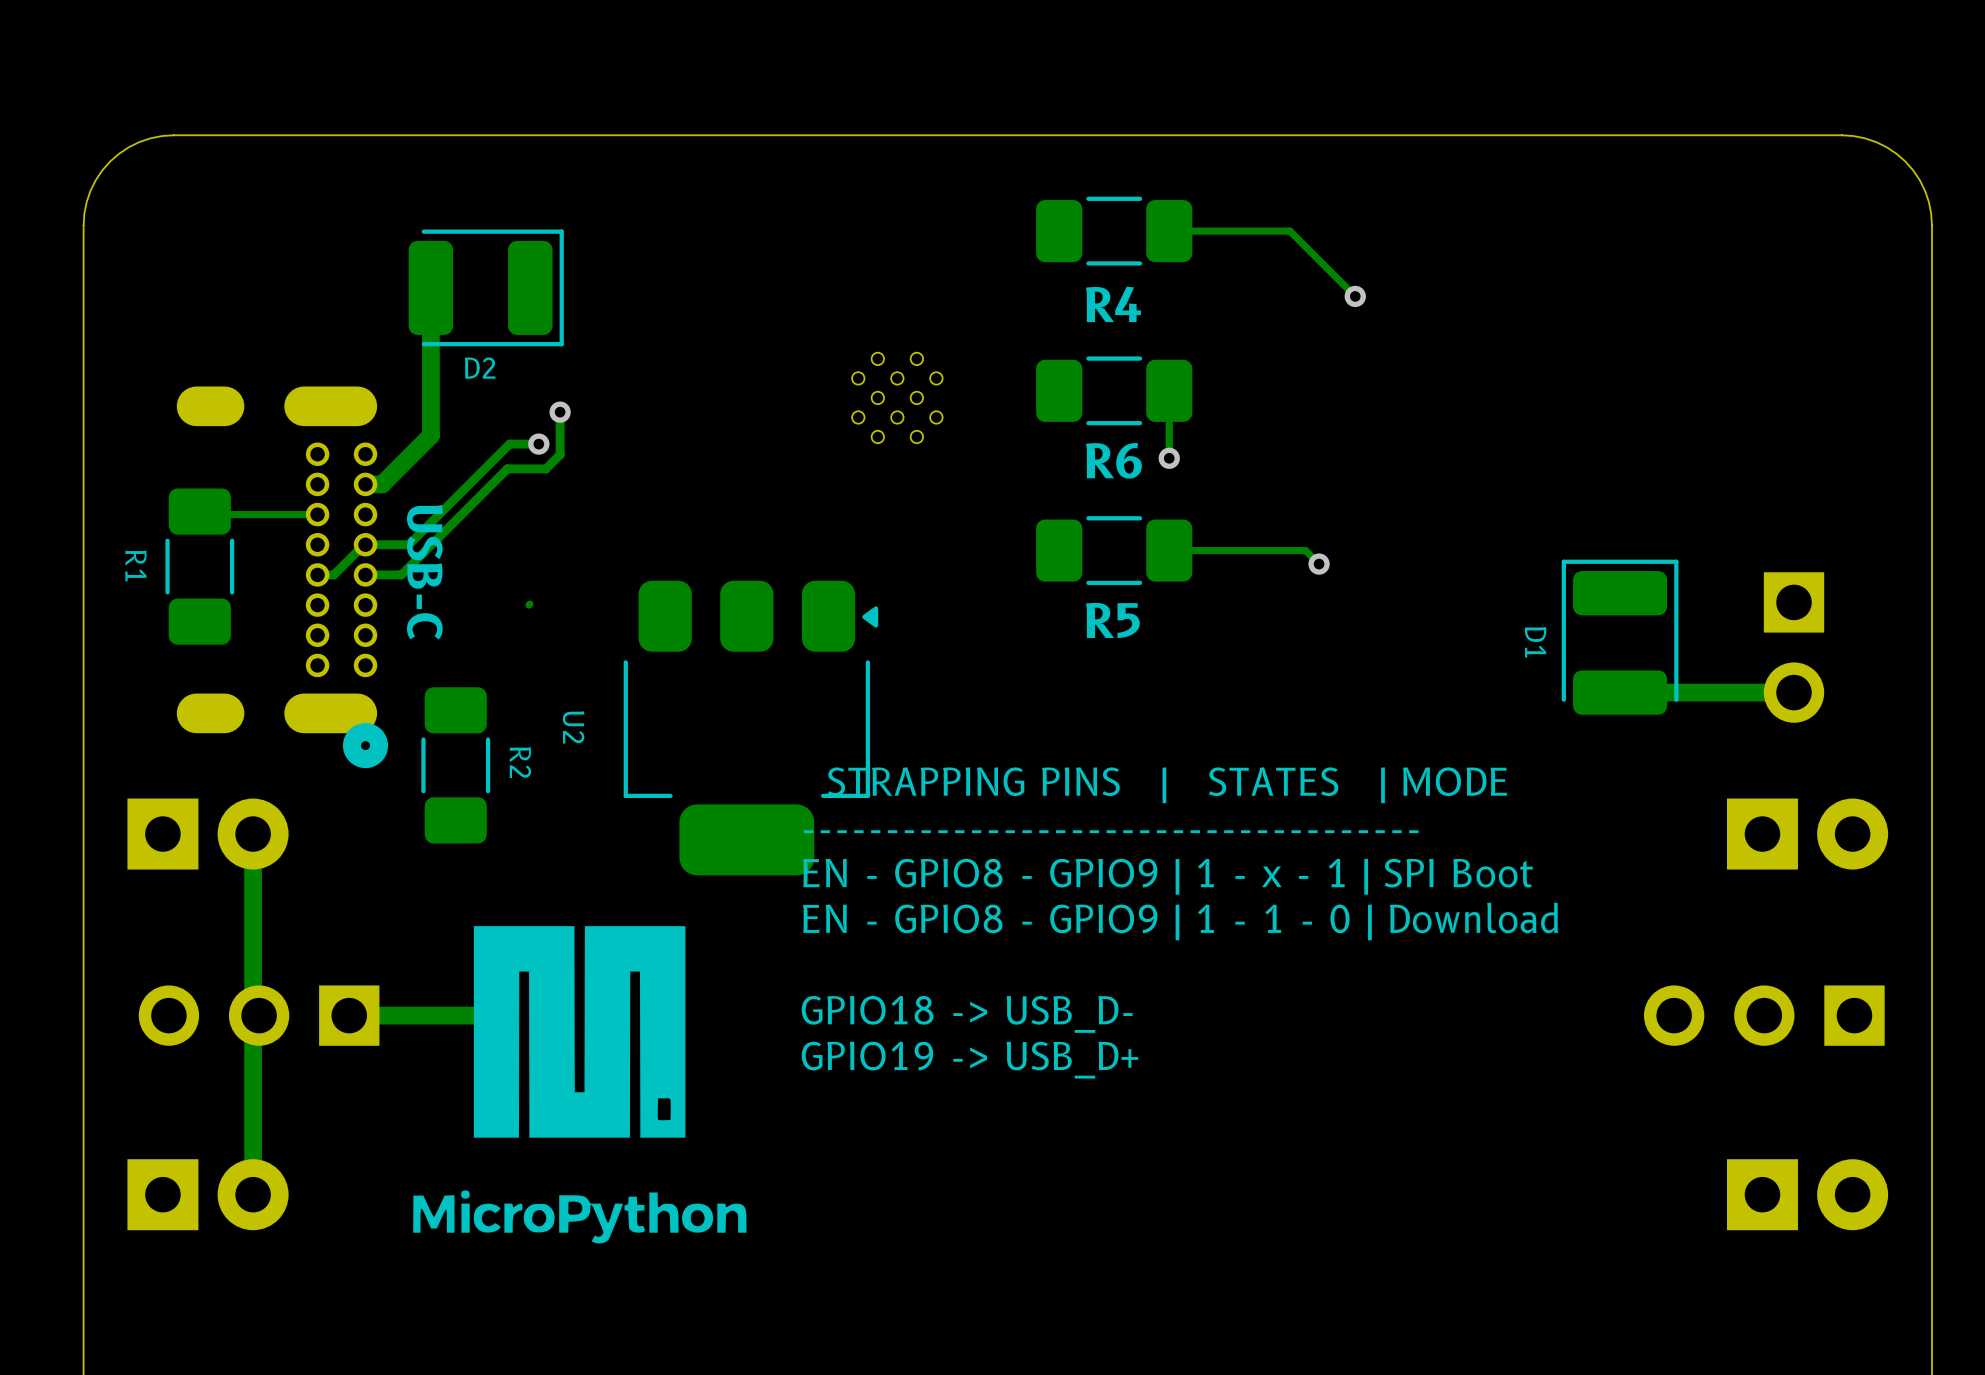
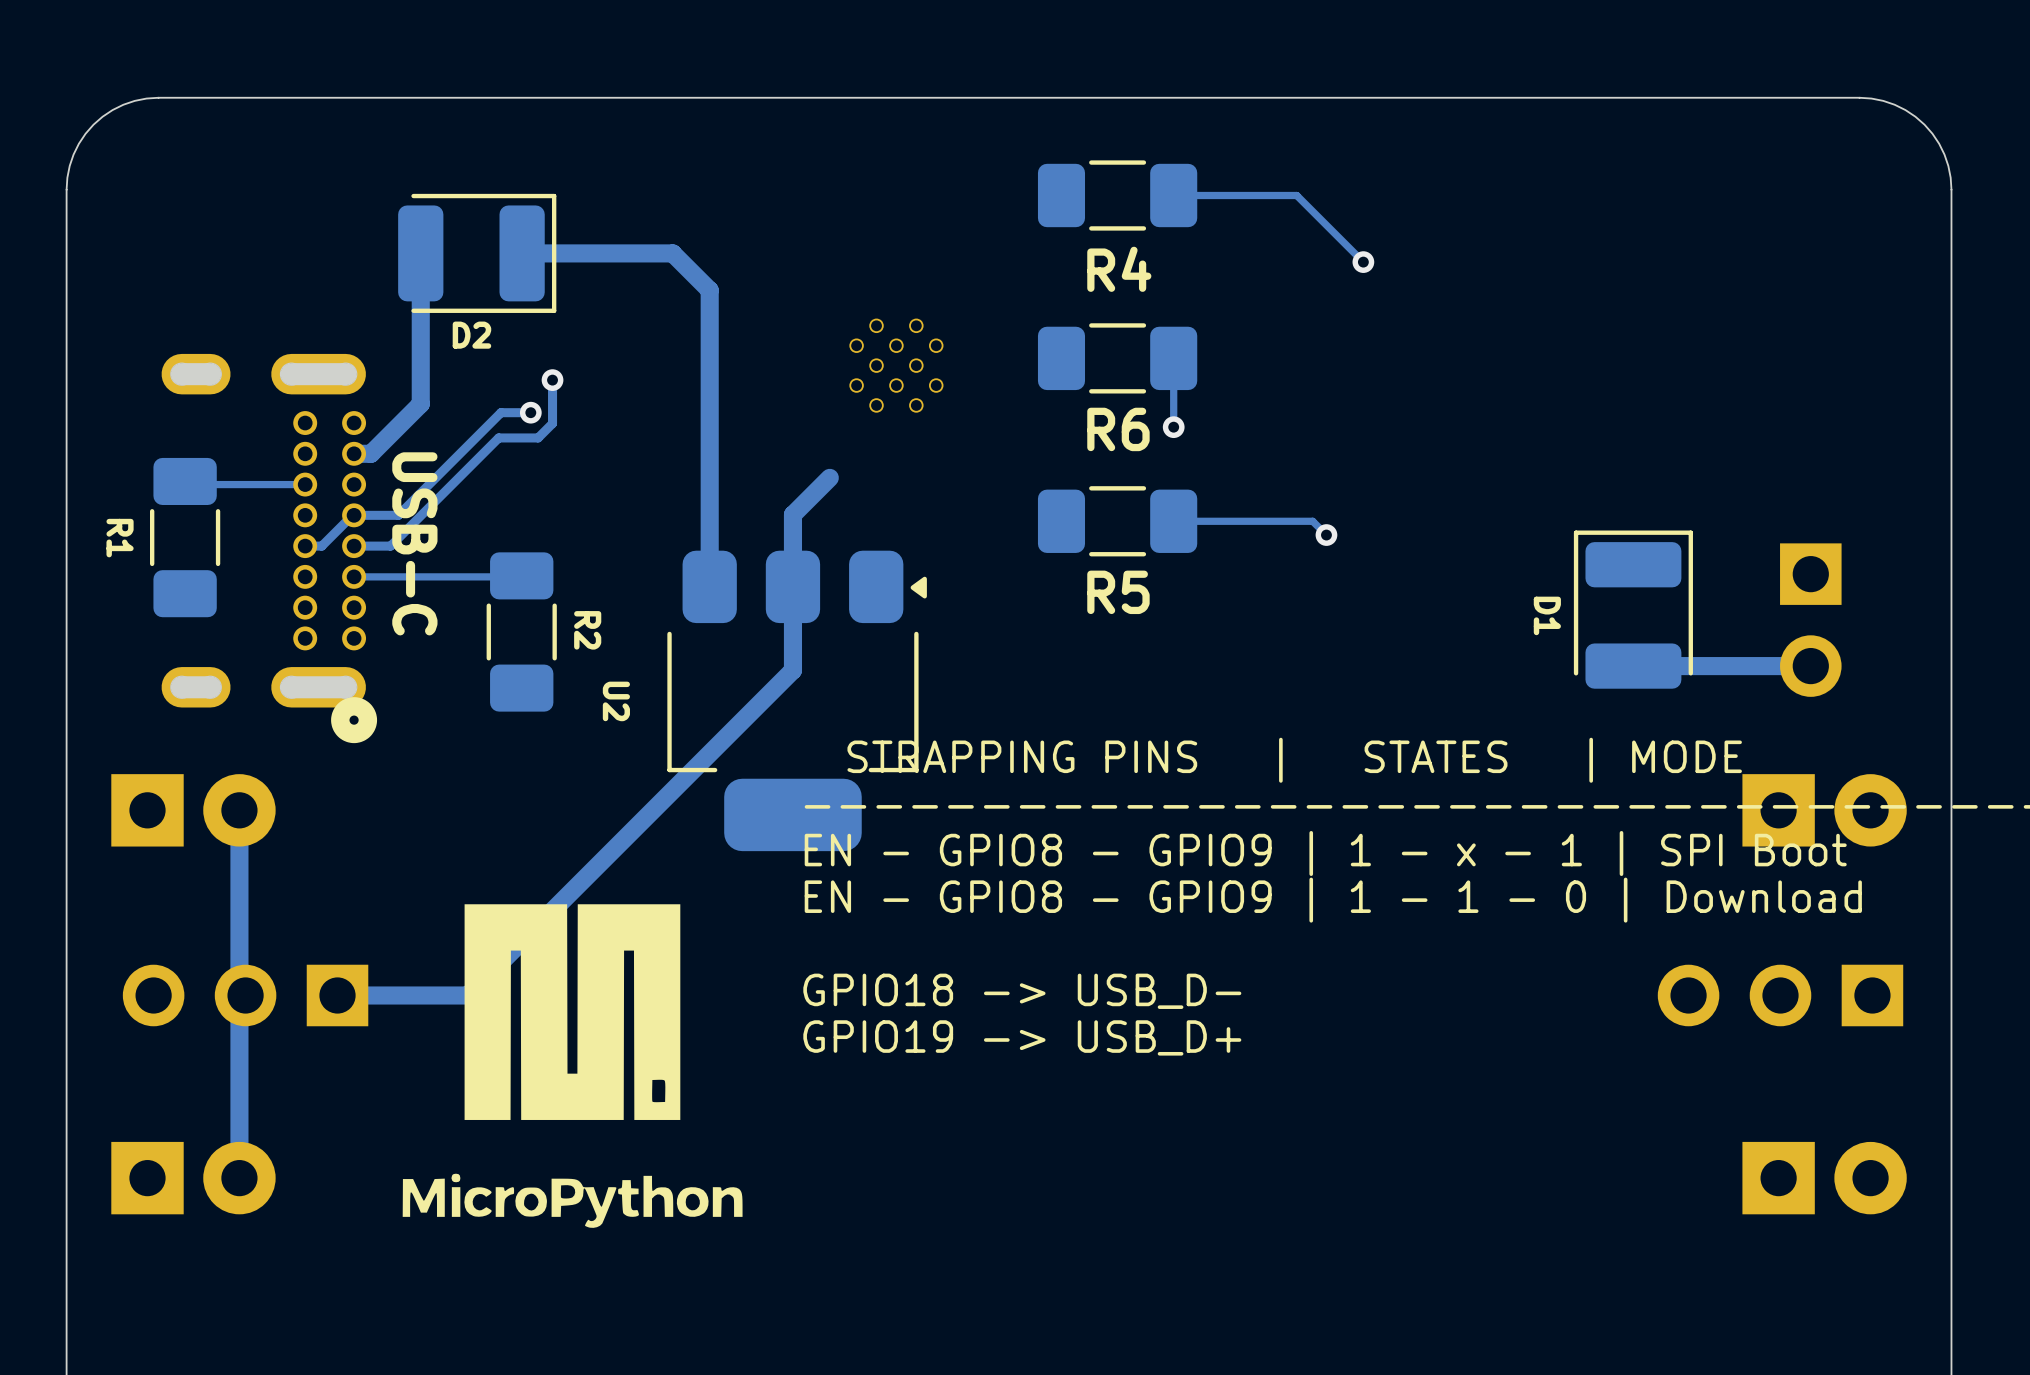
track: none -> (522, 253) (672, 253) (709, 290) (709, 586)
track: none -> (829, 477) (792, 514) (792, 670) (467, 995)
track: none -> (520, 576) (354, 576)
U2 position: (750, 728) -> (797, 700)
R2 position: (455, 765) -> (521, 631)

